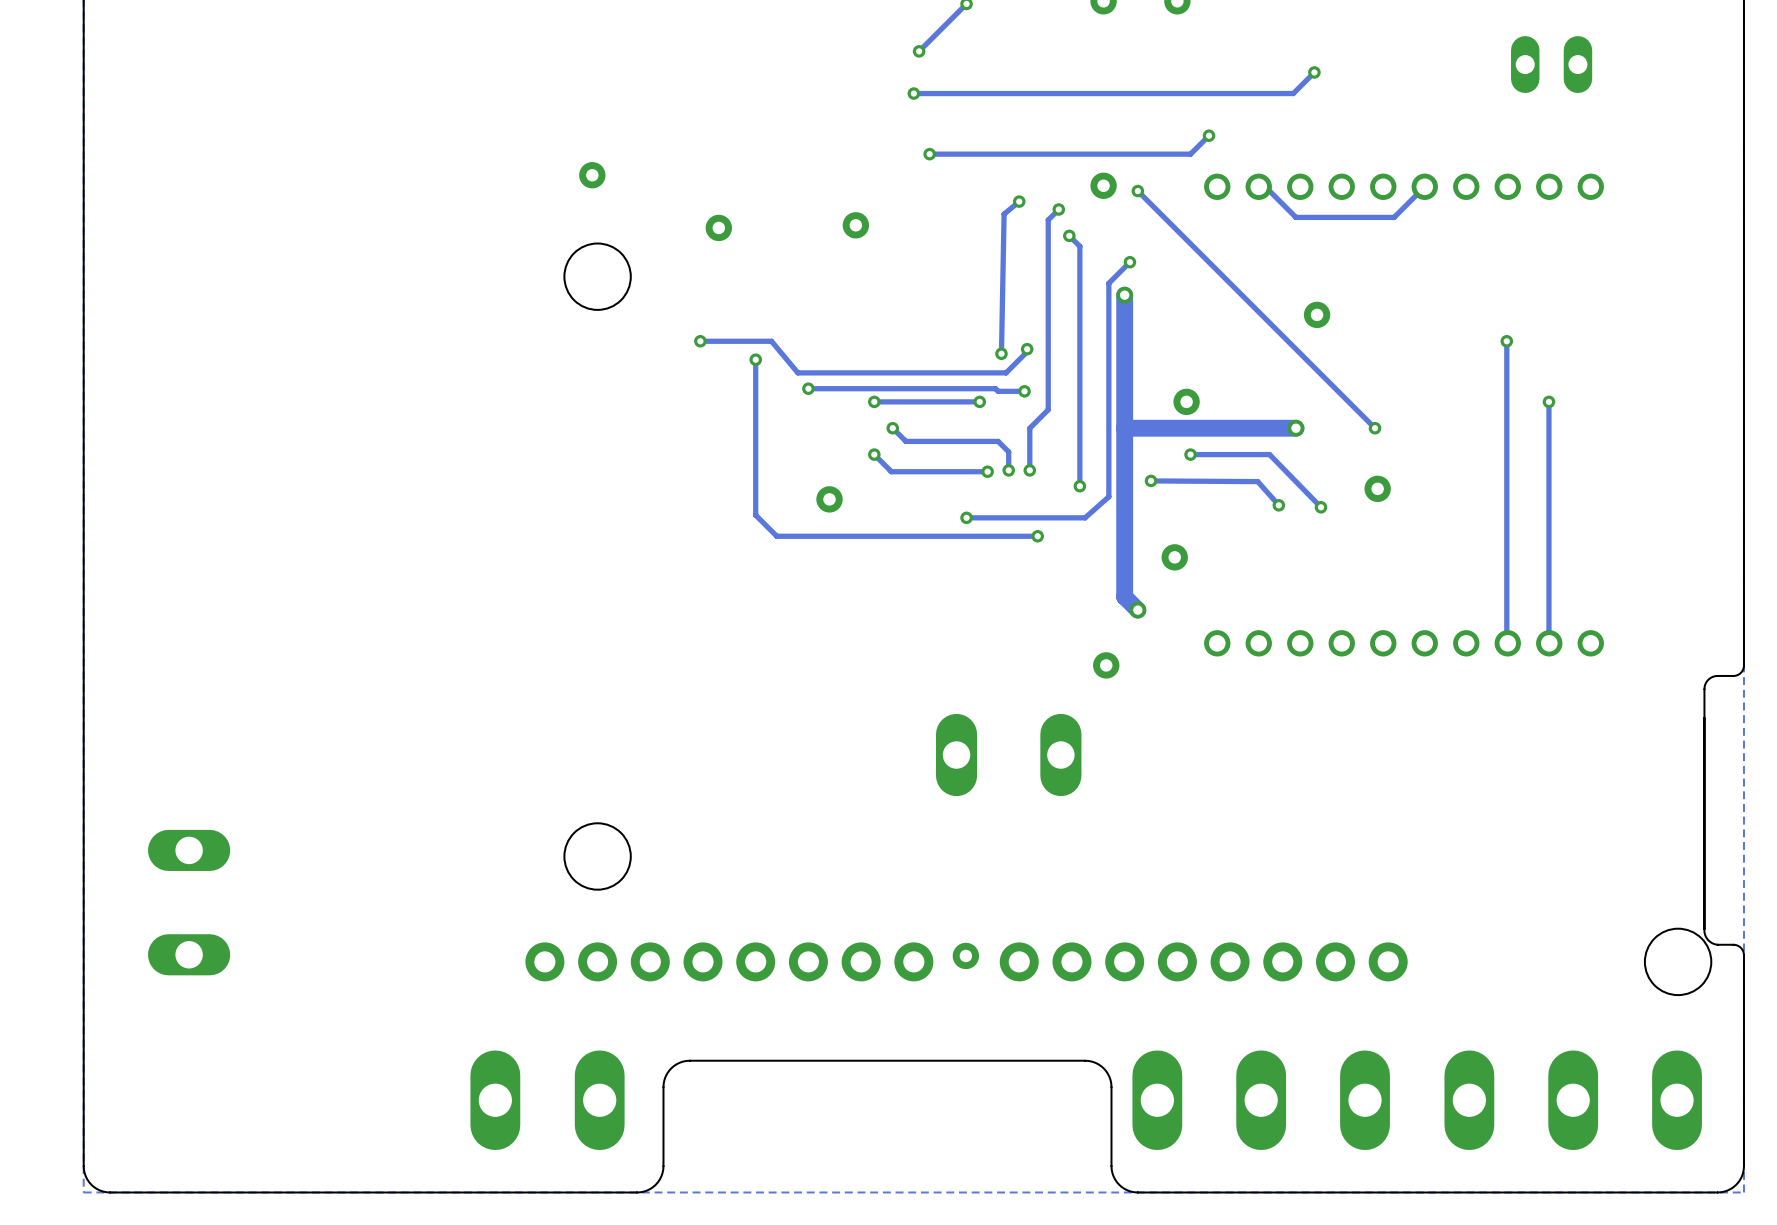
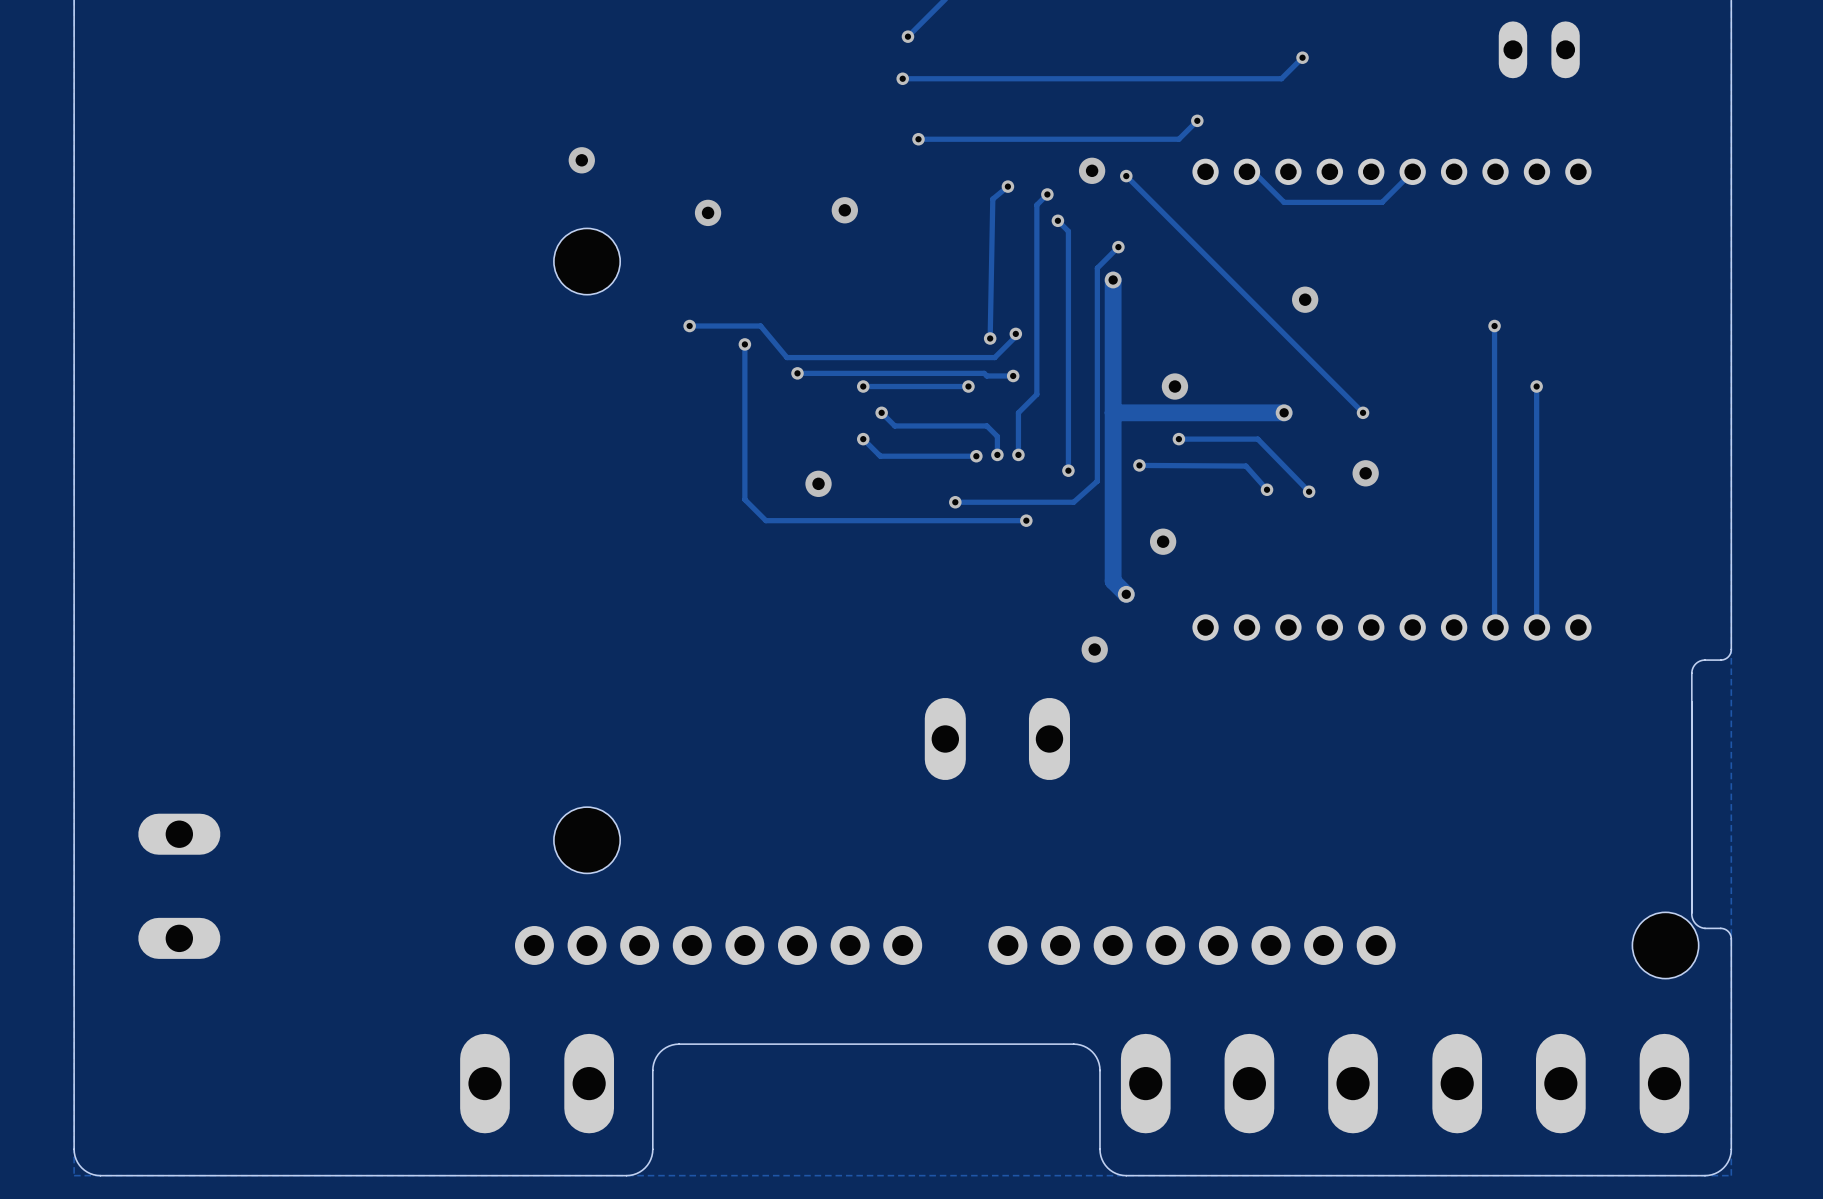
via: (965, 955) -> none

